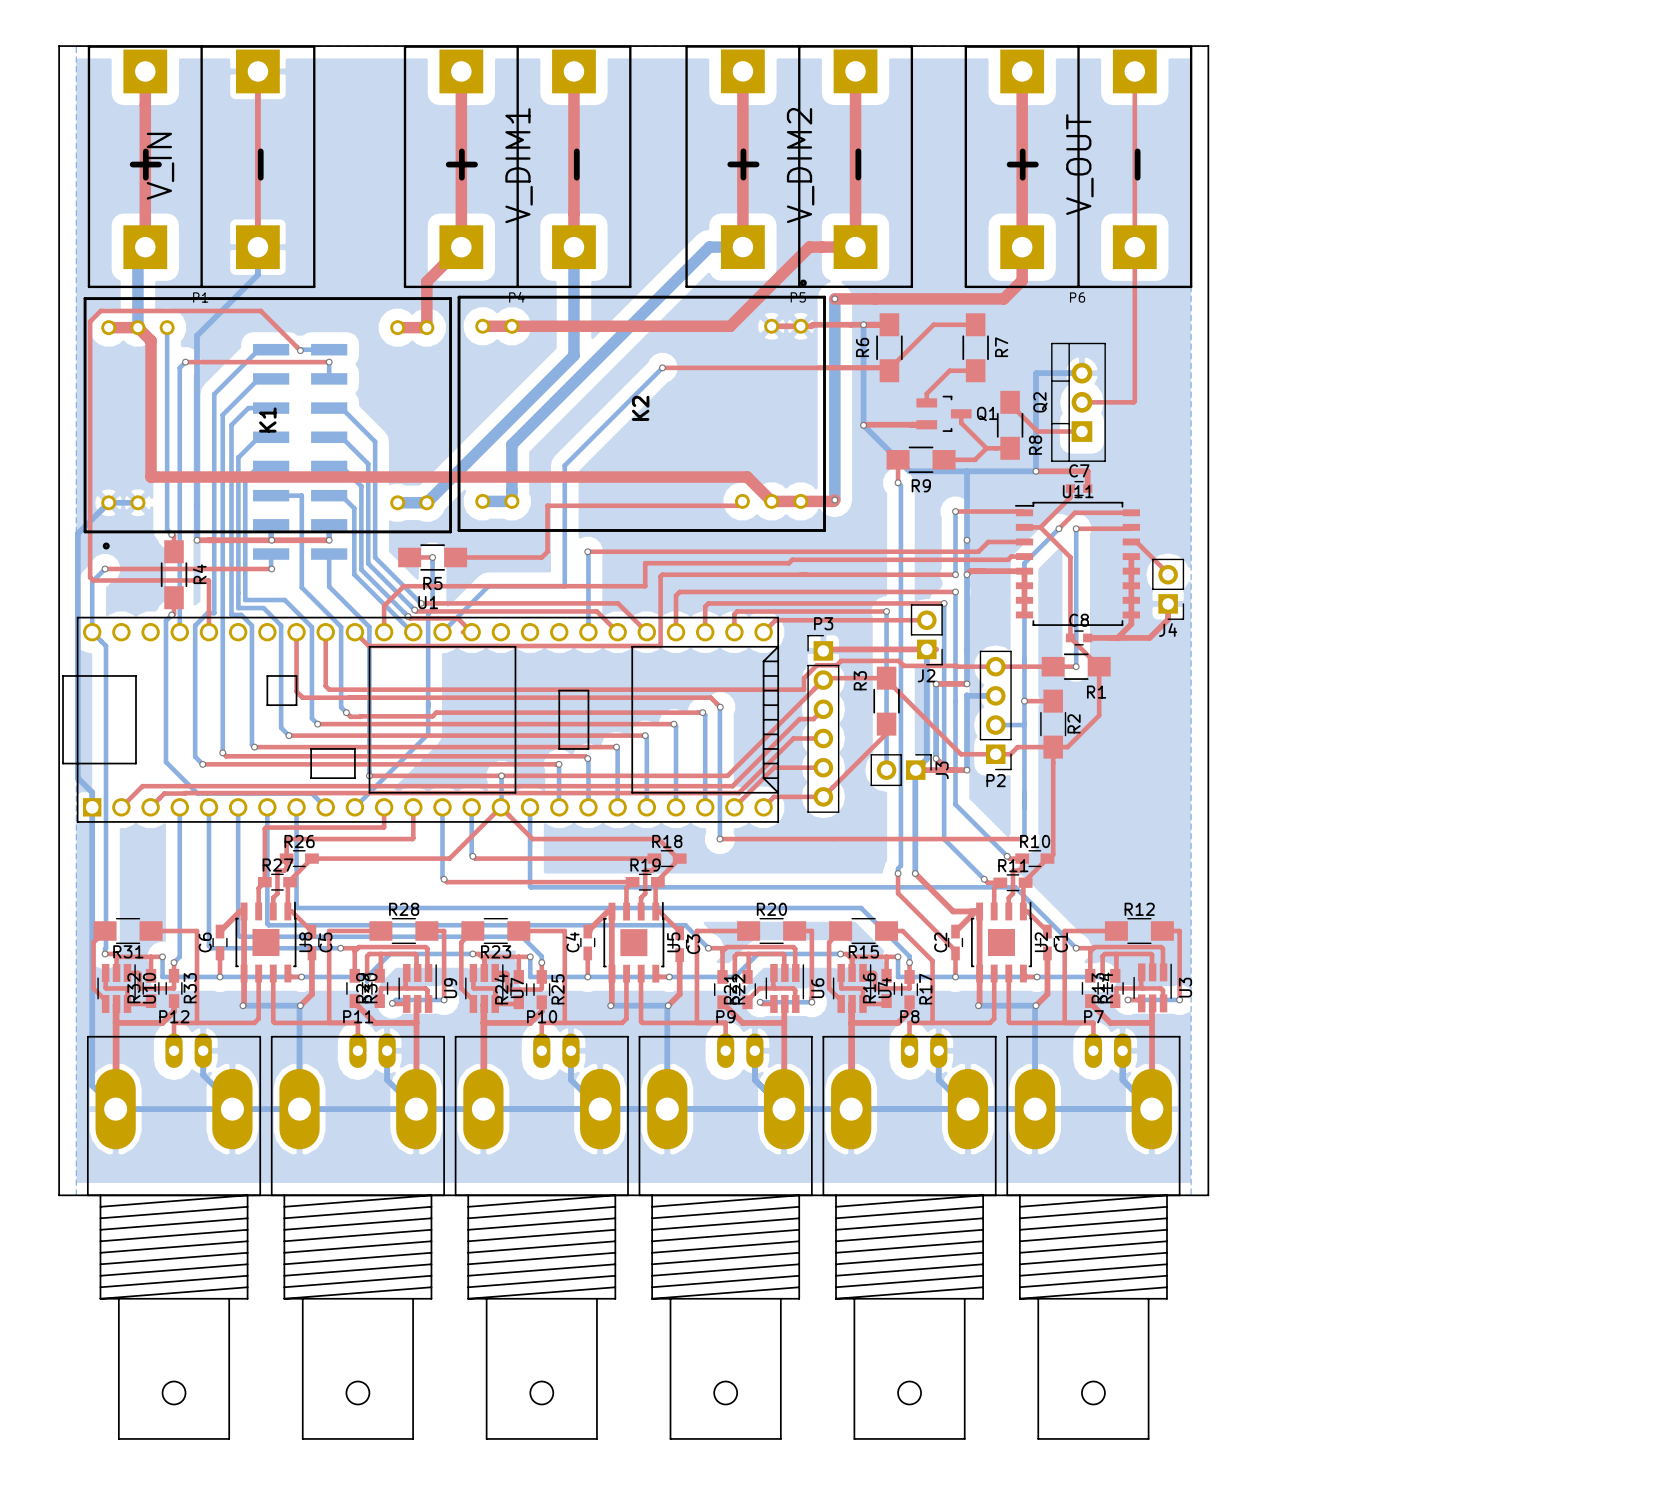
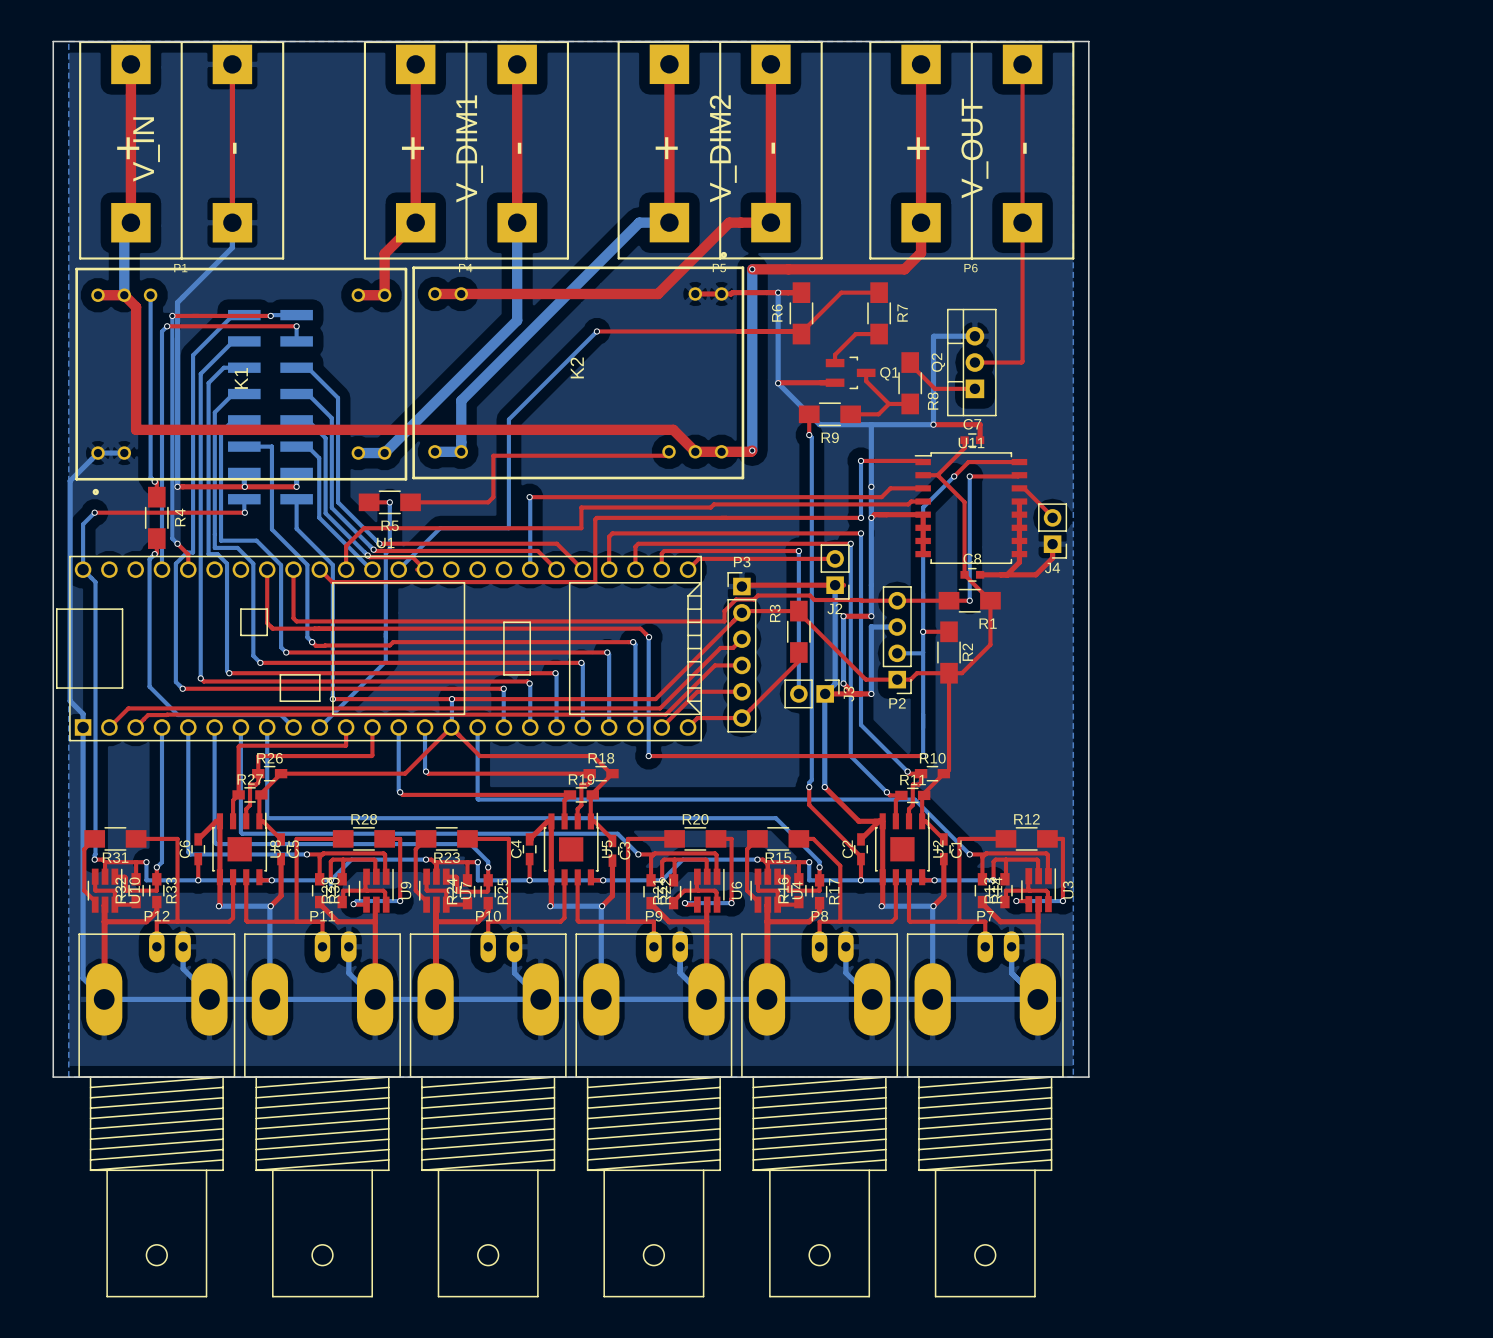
bottom track: none -> (172, 315) (172, 538) (177, 543)
via: none -> (172, 315)
top track: (300, 350) (260, 310) (100, 310) (90, 321) (90, 577) (93, 580) (208, 580) (208, 615) -> (270, 315) (172, 315)
top track: none -> (177, 543) (188, 554)
via: none -> (177, 543)

